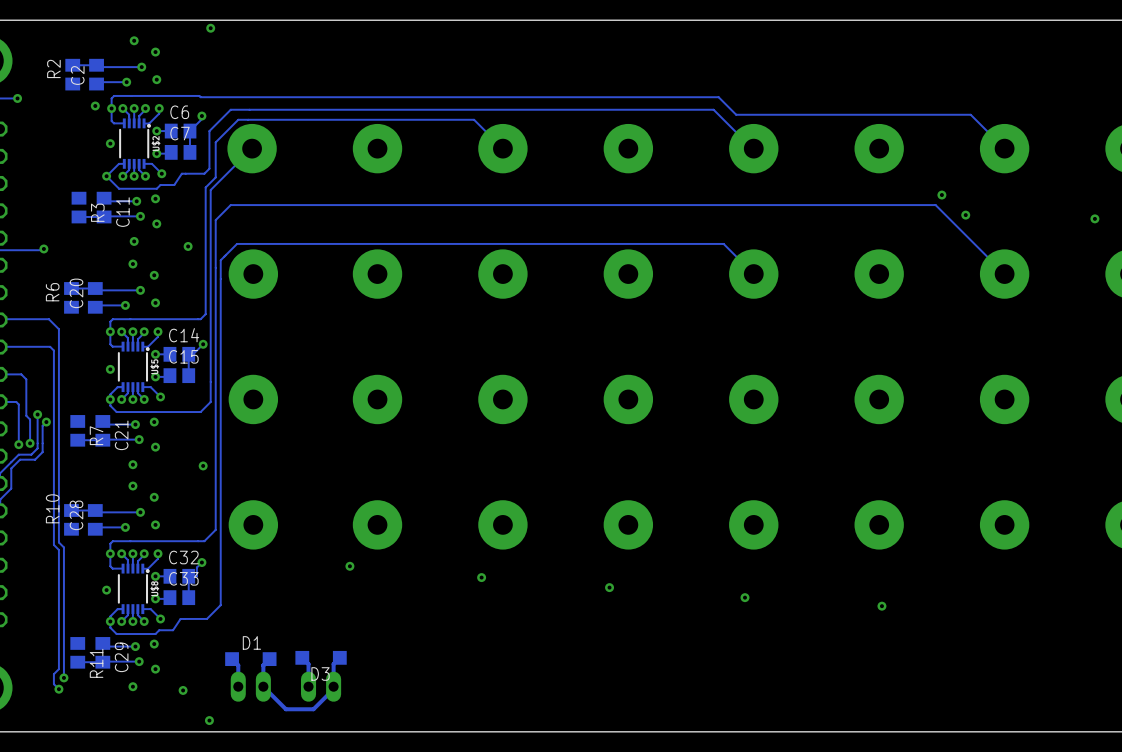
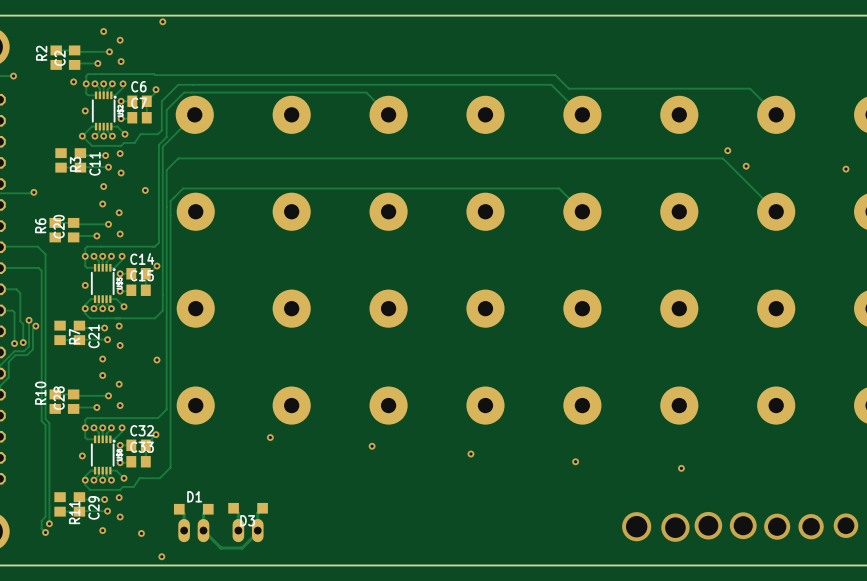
via: none -> (708, 525)
via: none -> (743, 525)
via: none -> (845, 525)
via: none -> (636, 526)
via: none -> (777, 526)
via: none -> (811, 526)
via: none -> (675, 527)

